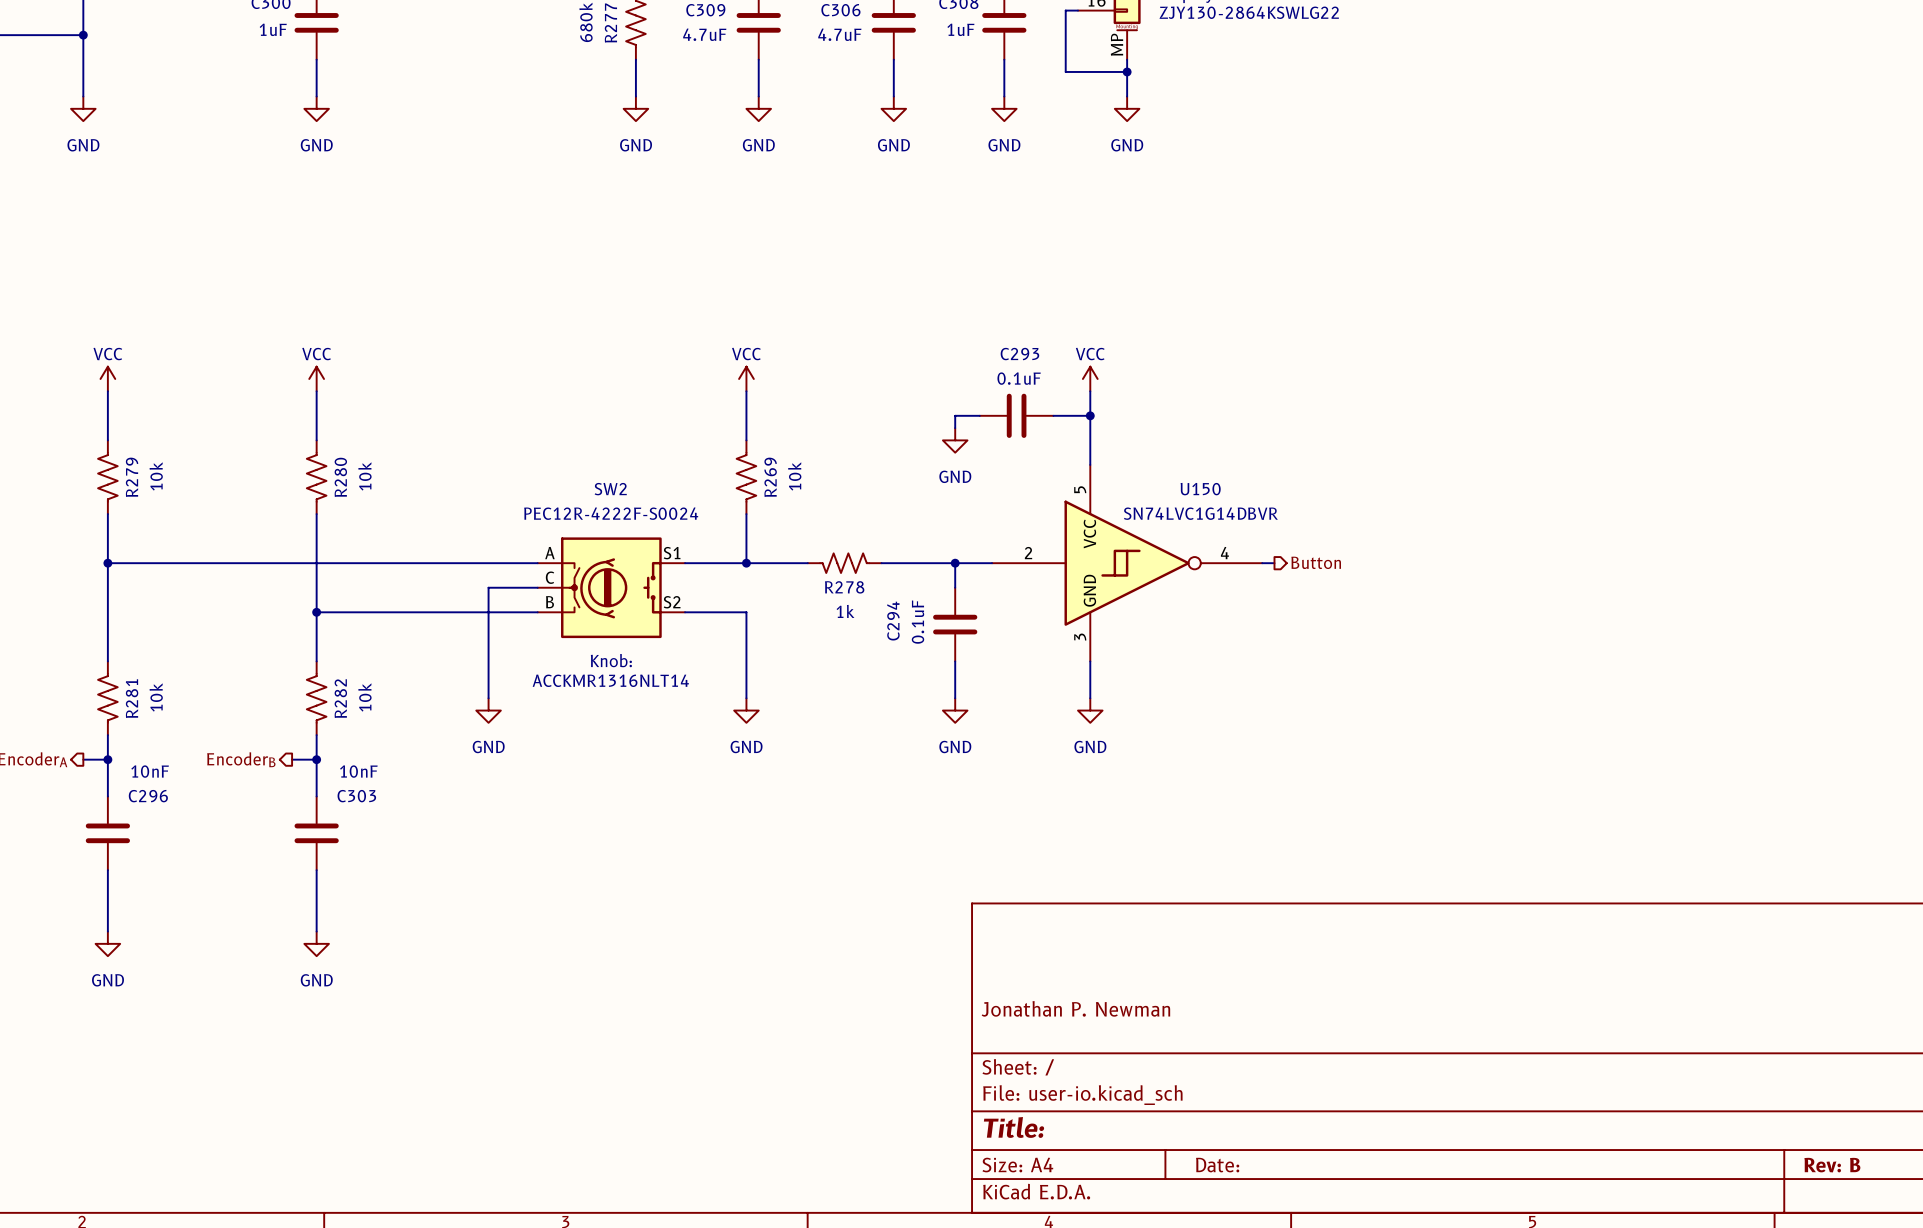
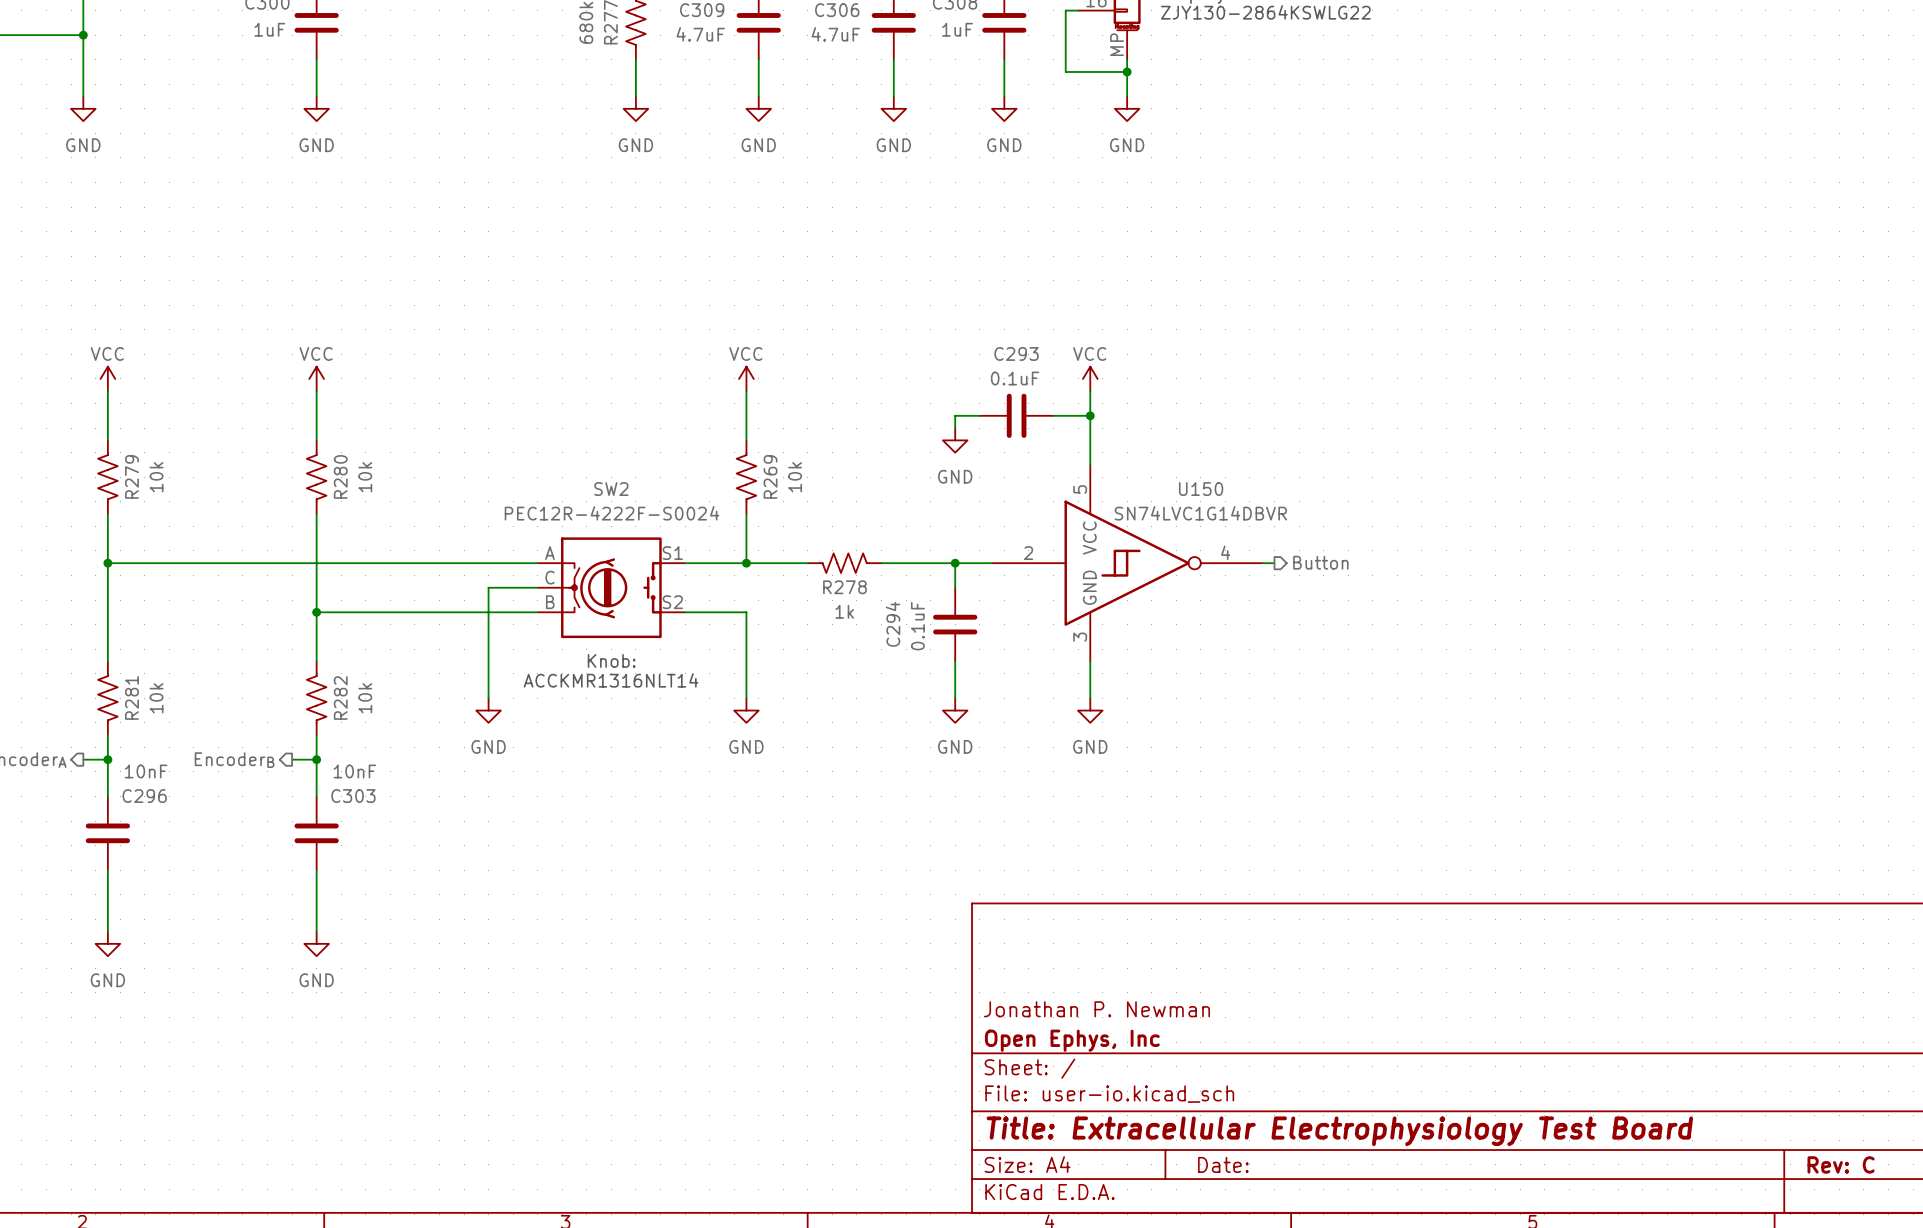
title block: none -> Open Ephys, Inc (1072, 1040)
title block: Title: (1014, 1127) -> Title: Extracellular Electrophysiology Test Board (1339, 1131)
title block: Rev: B (1832, 1165) -> Rev: C (1841, 1164)

